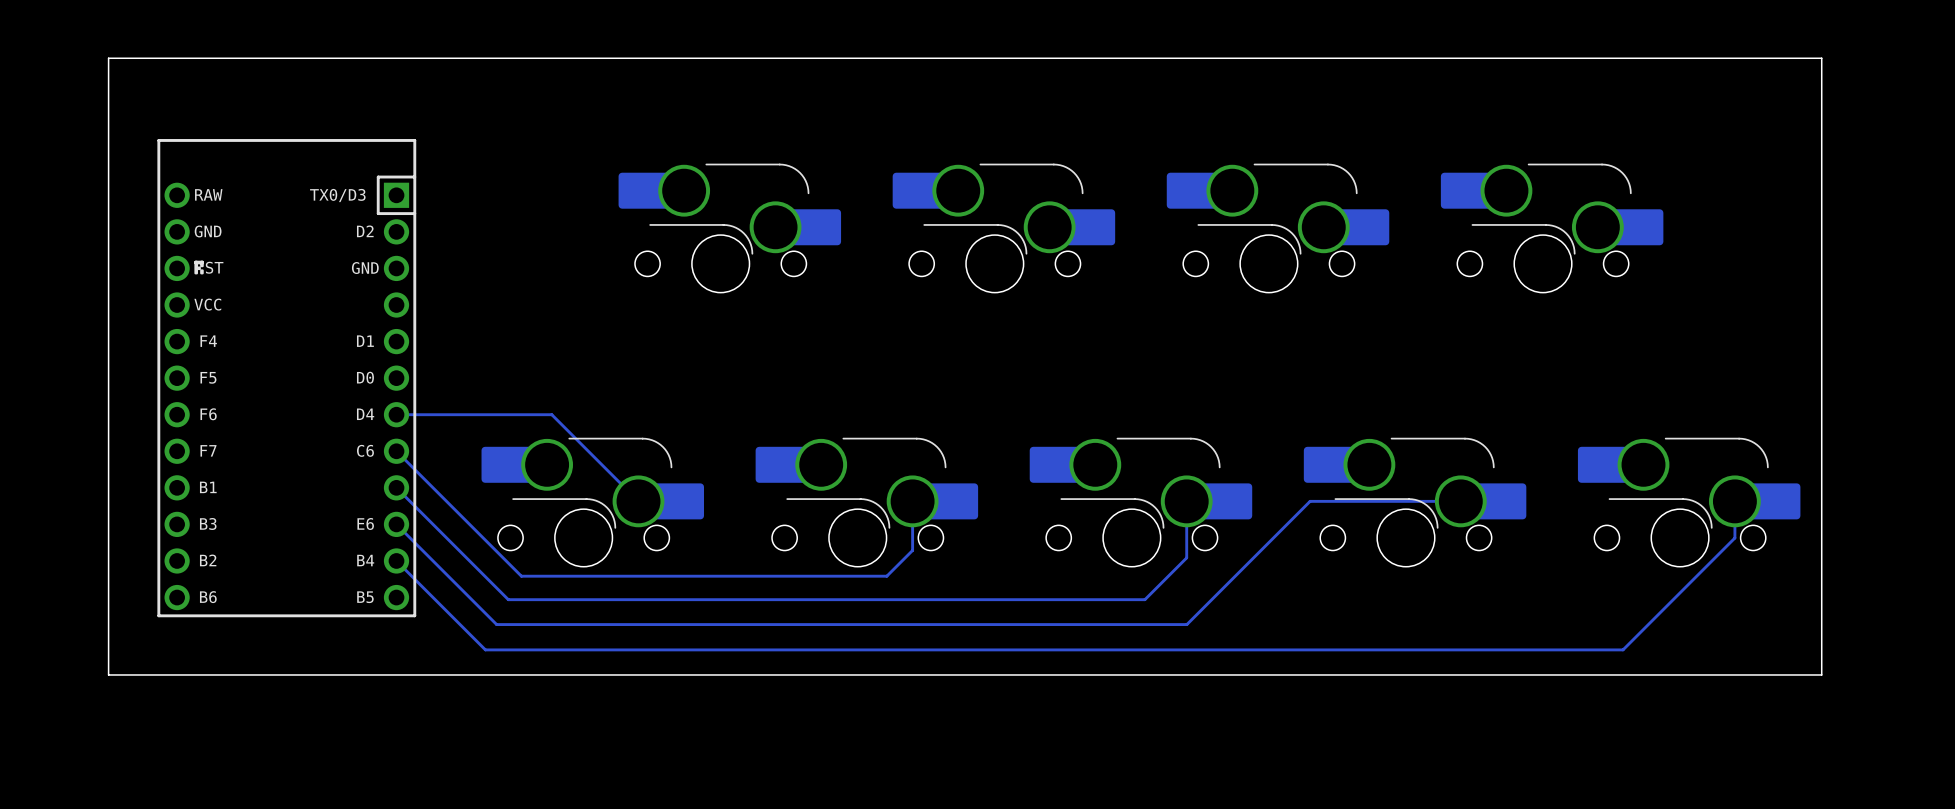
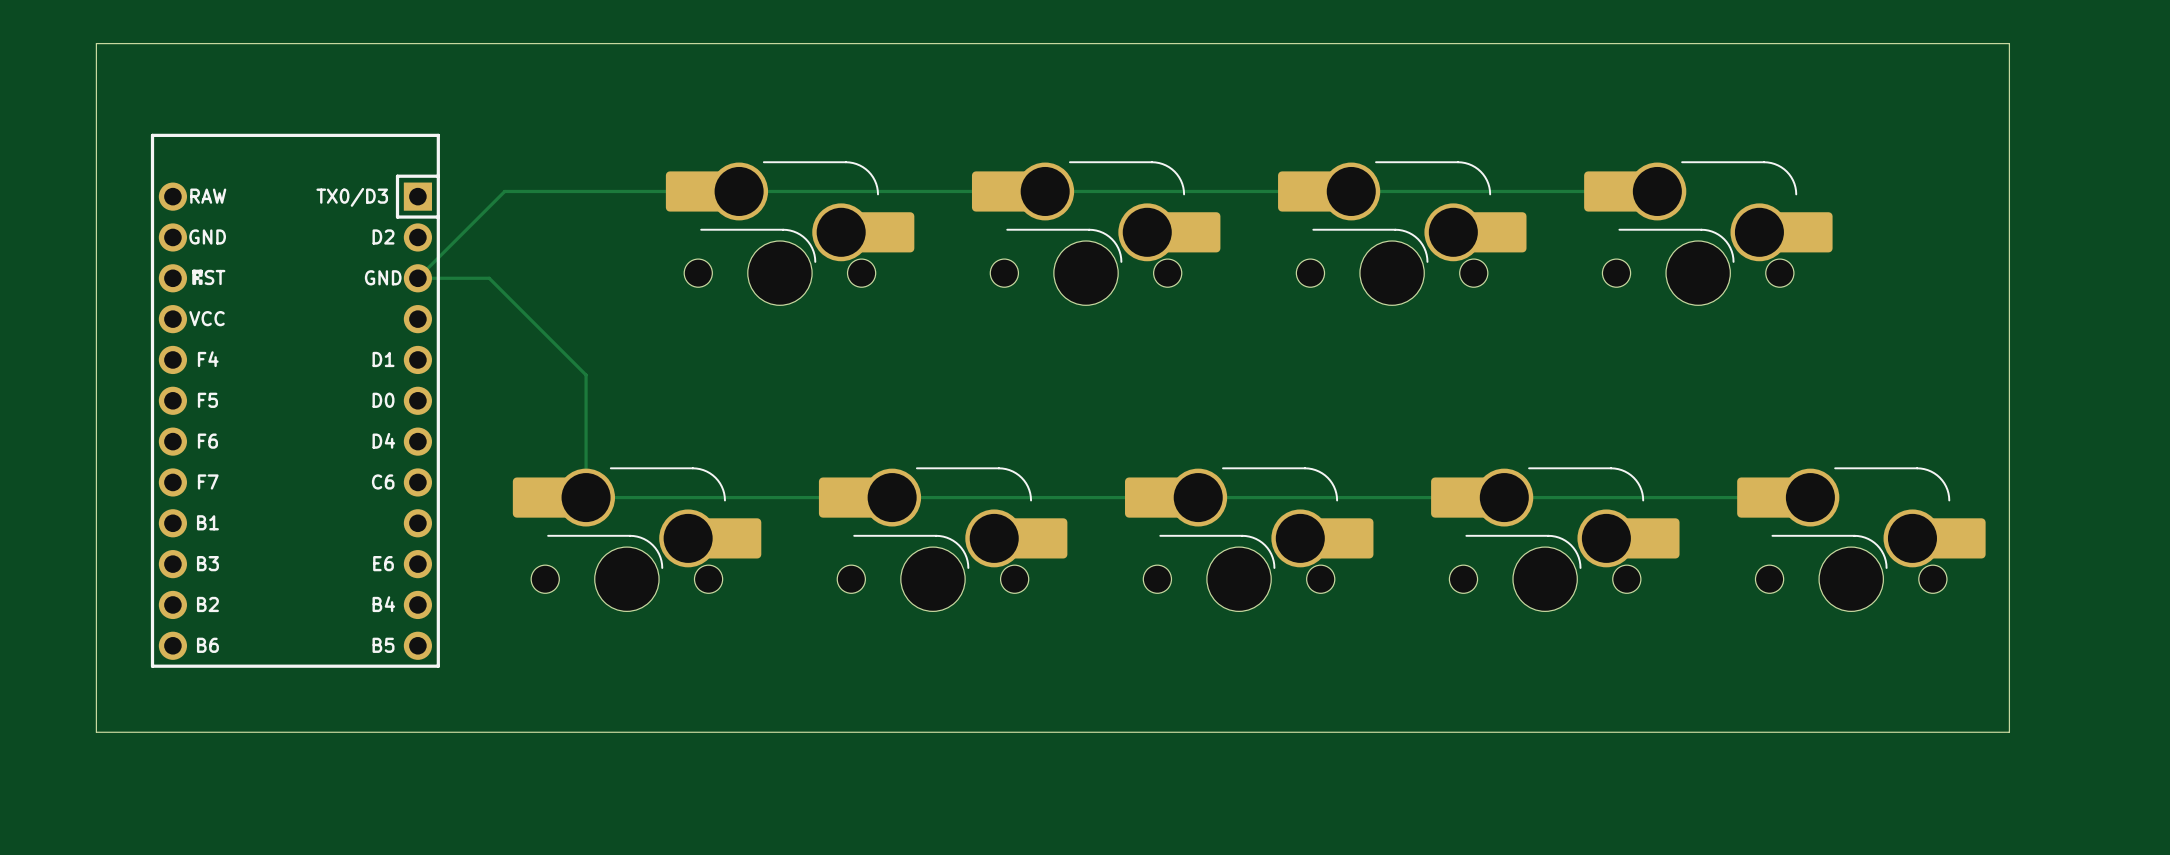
track: none -> (1657, 191) (504, 191) (417, 278) (489, 278) (586, 375) (586, 497) (1810, 497)
track: (396, 414) (551, 414) (638, 501) -> none
track: (396, 451) (521, 576) (886, 576) (912, 550) (912, 501) -> none
track: (396, 487) (508, 599) (1144, 599) (1186, 557) (1186, 501) -> none
track: (1460, 501) (1310, 501) (1186, 624) (496, 624) (396, 524) -> none
track: (1734, 501) (1734, 538) (1623, 649) (485, 649) (396, 560) -> none

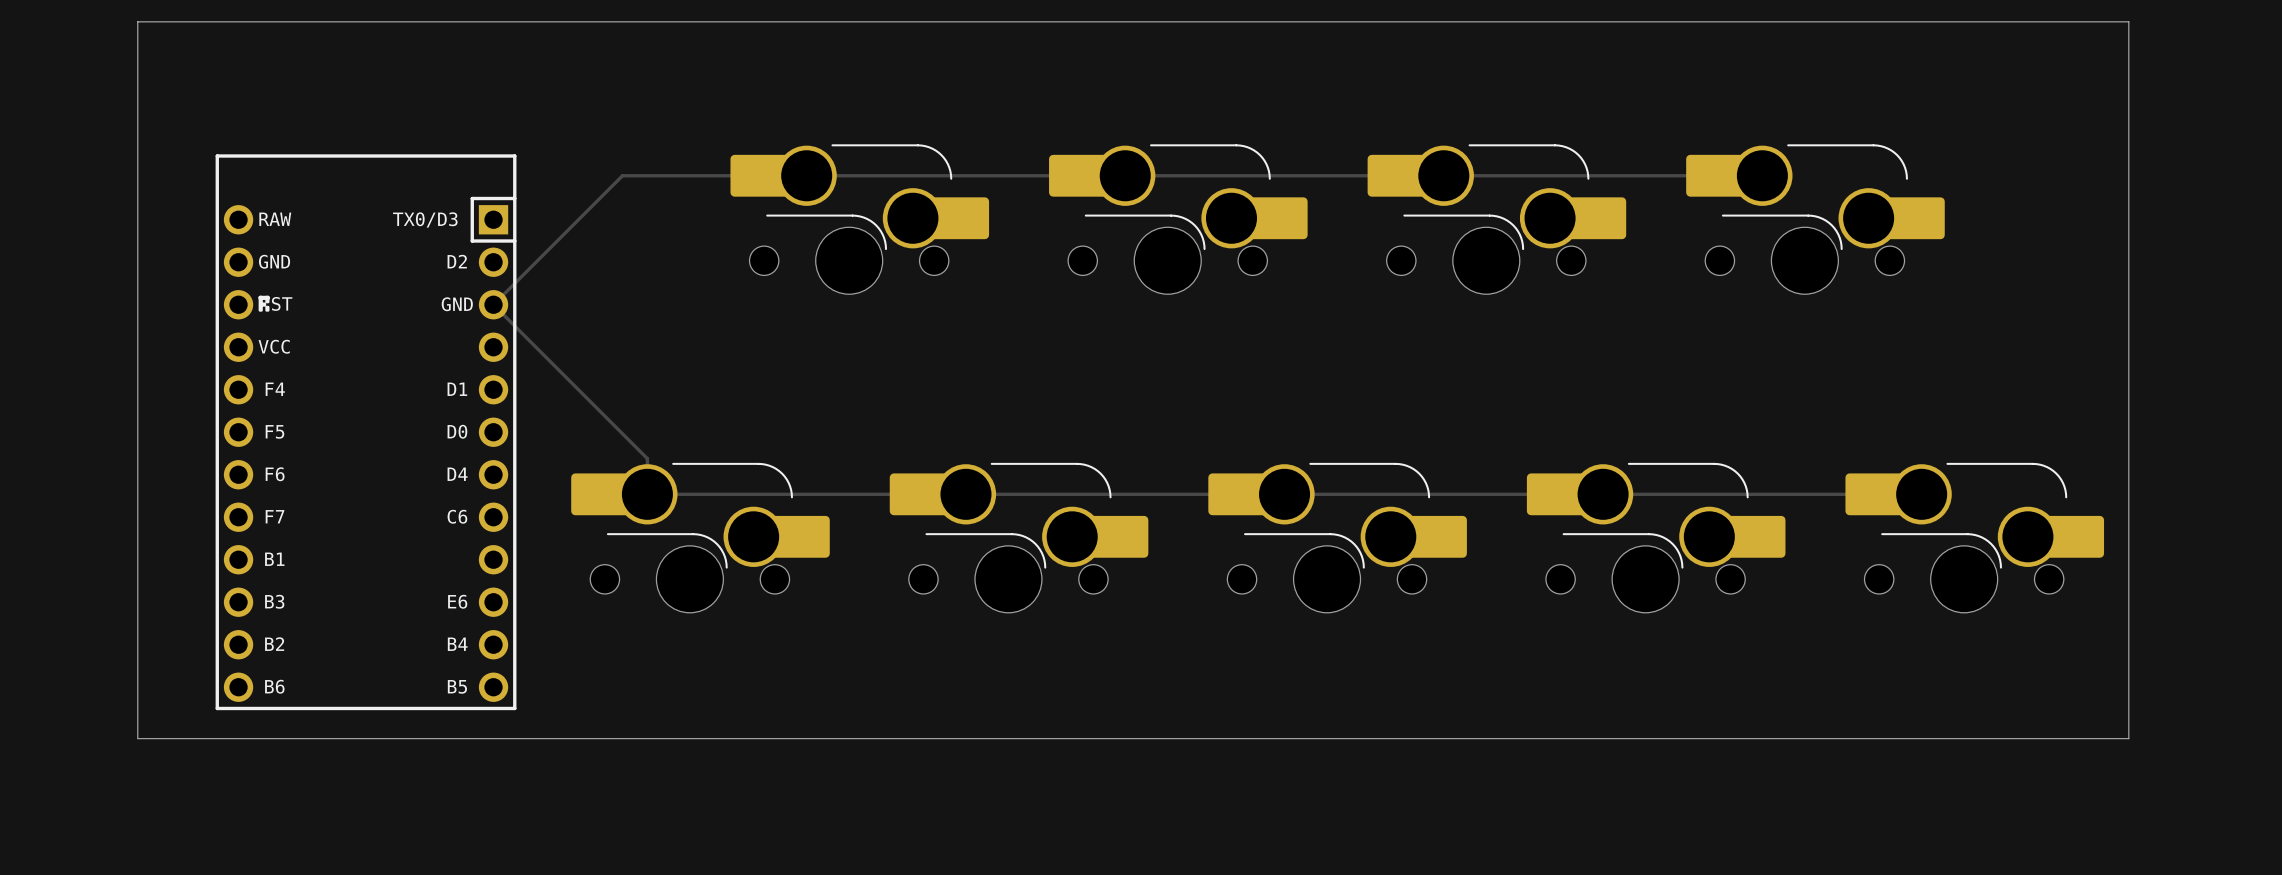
track: (562, 191) (504, 191) (417, 278) (489, 278) (586, 375) (586, 463) -> (622, 175) (493, 304) (647, 458)
part position: (295, 400) -> (366, 432)

